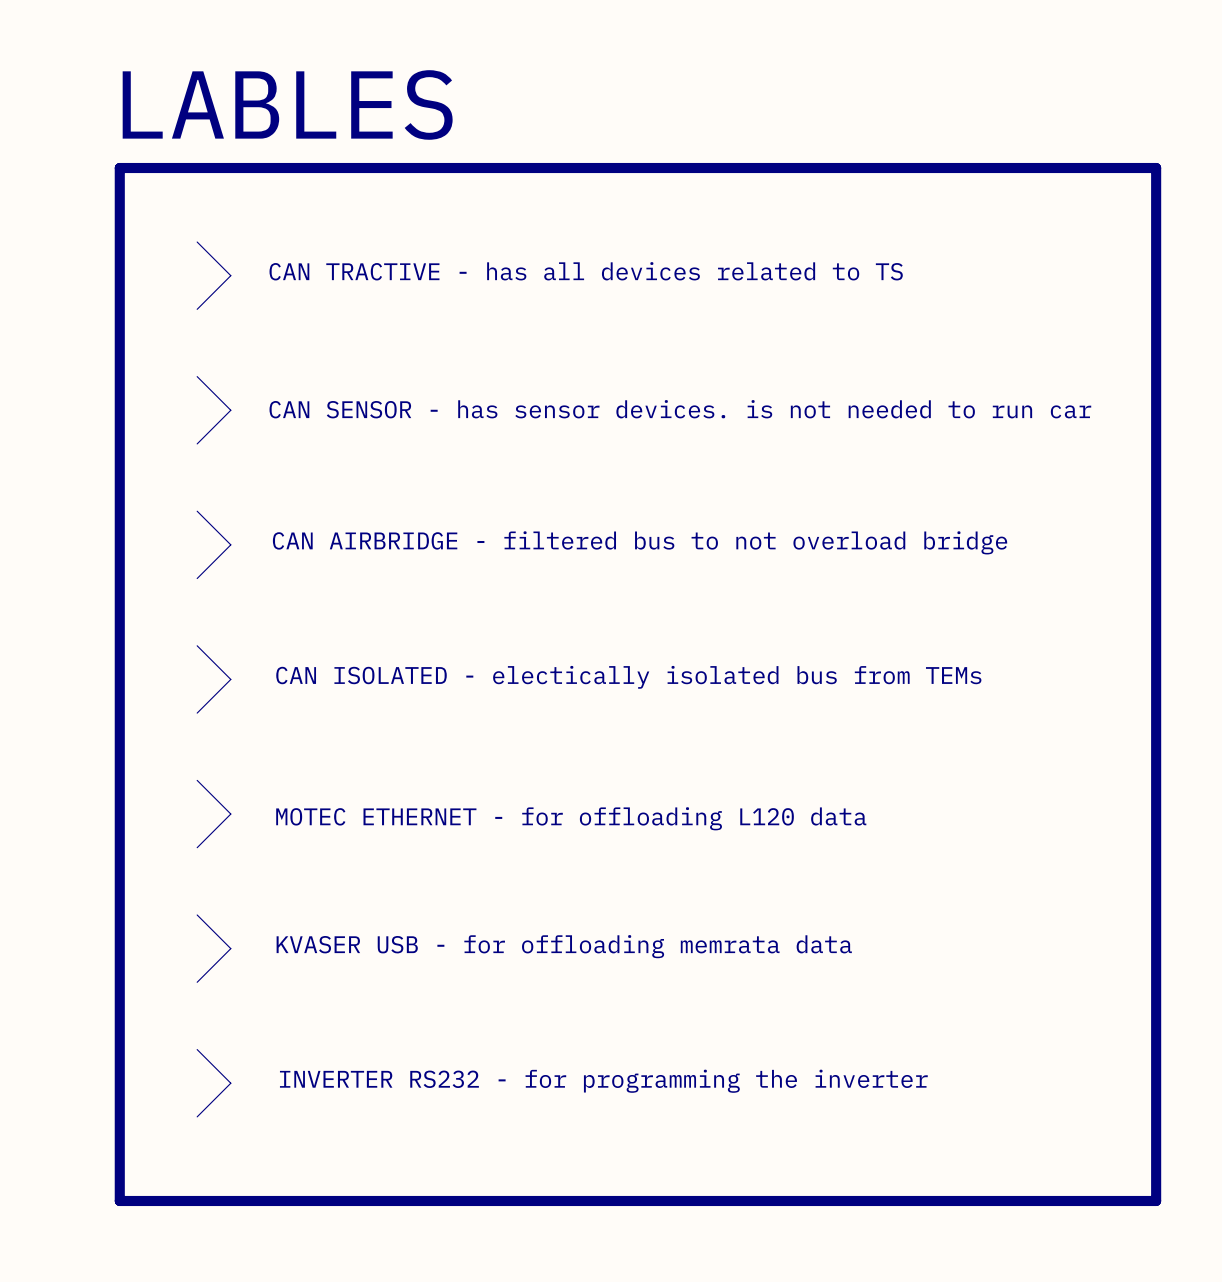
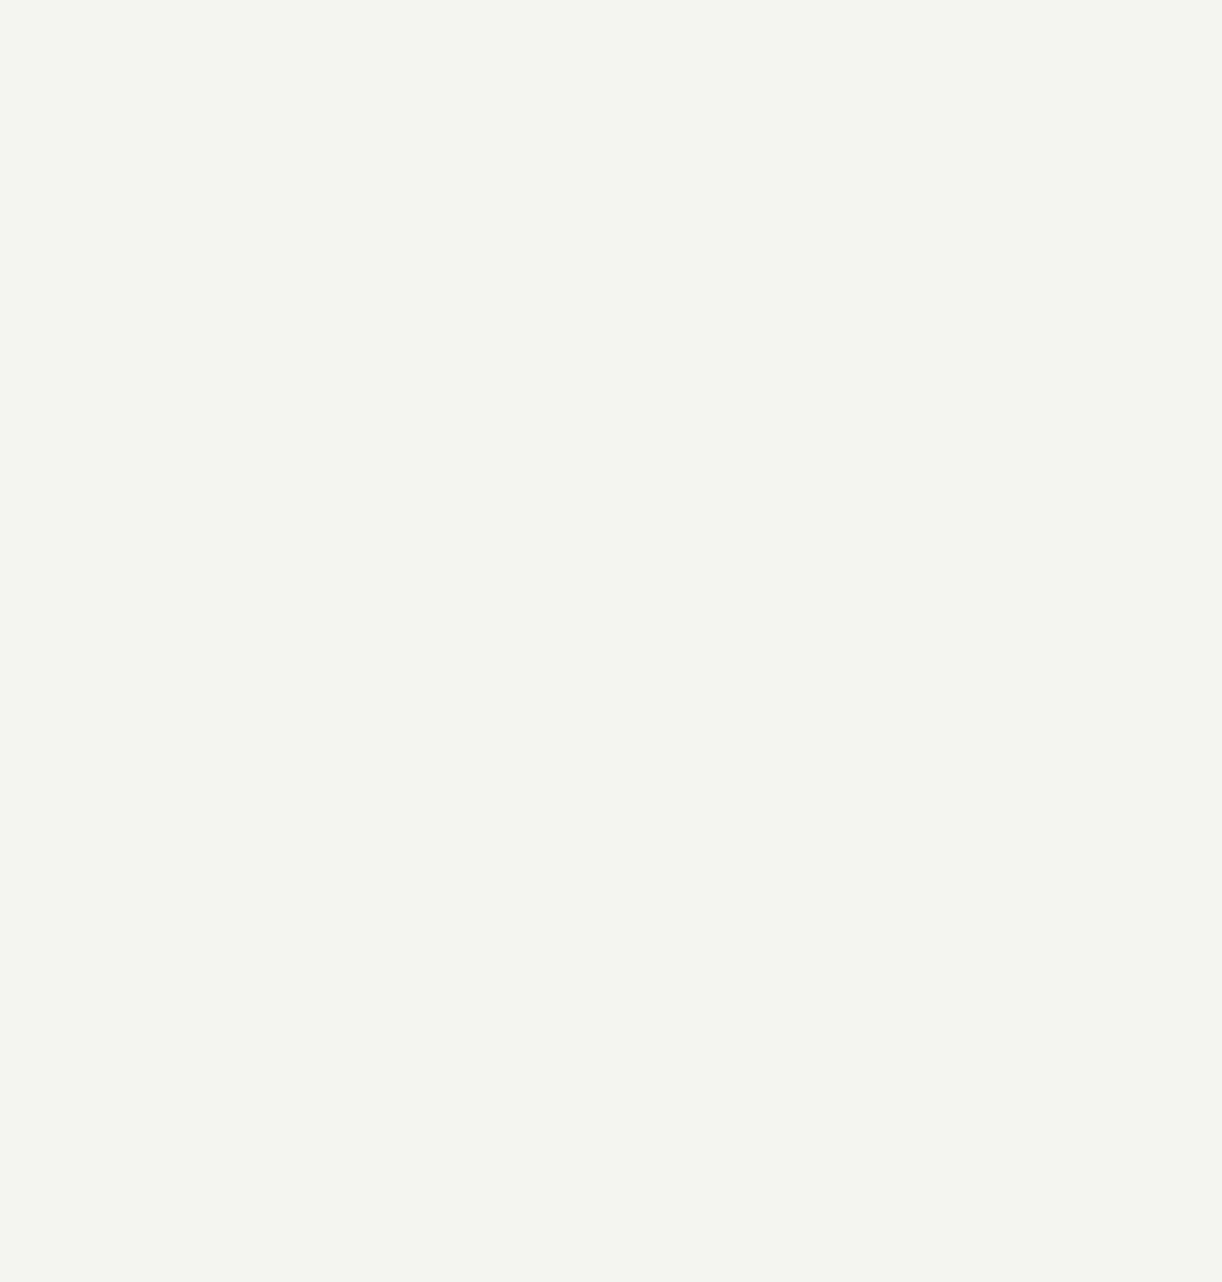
text: LABLES (287, 104) -> none
line: (119, 168) (1156, 168) (1156, 1200) (119, 1200) (119, 168) -> none
wire: (197, 242) (230, 275) (197, 309) -> none
text: CAN TRACTIVE - has all devices related to TS (586, 271) -> none
wire: (197, 376) (230, 410) (197, 443) -> none
text: CAN SENSOR - has sensor devices. is not needed to run car (680, 409) -> none
wire: (197, 511) (230, 544) (197, 578) -> none
text: CAN AIRBRIDGE - filtered bus to not overload bridge (640, 542) -> none
wire: (197, 645) (230, 679) (197, 713) -> none
text: CAN ISOLATED - electically isolated bus from TEMs (628, 677) -> none
wire: (197, 780) (230, 814) (197, 847) -> none
text: MOTEC ETHERNET - for offloading L120 data (571, 818) -> none
wire: (197, 914) (230, 948) (197, 982) -> none
text: KVASER USB - for offloading memrata data (564, 946) -> none
wire: (197, 1049) (230, 1083) (197, 1116) -> none
text: INVERTER RS232 - for programming the inverter (603, 1081) -> none

